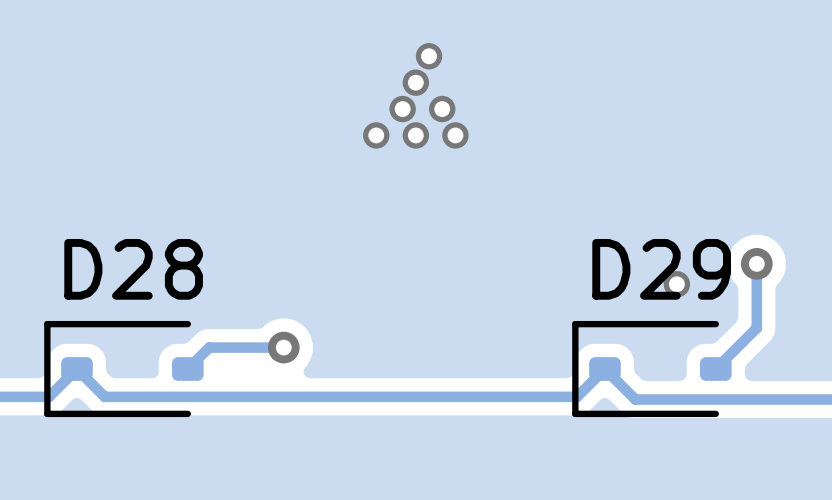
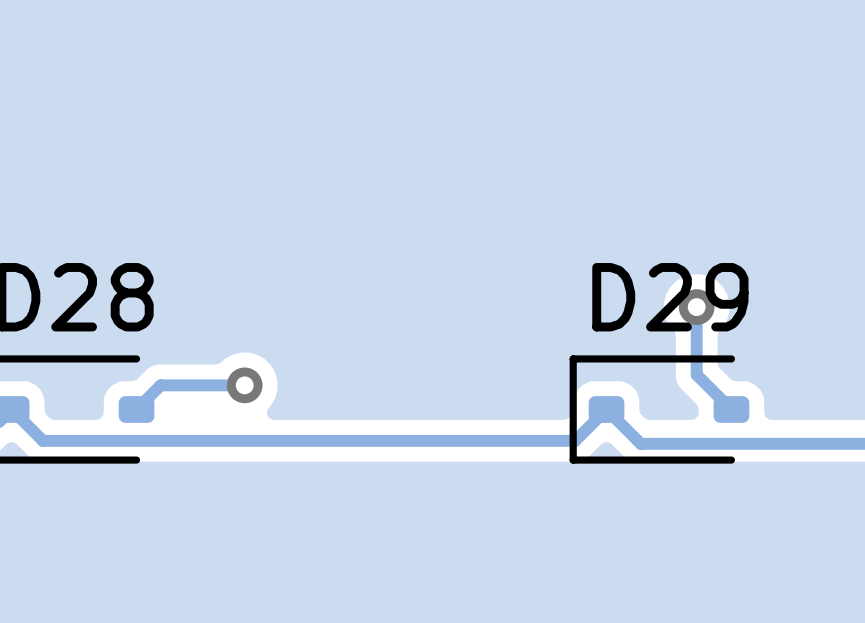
via: (429, 56) -> none
via: (415, 82) -> none
via: (402, 109) -> none
via: (442, 109) -> none
via: (376, 135) -> none
via: (415, 135) -> none
via: (455, 135) -> none
track: (756, 263) (756, 327) (715, 369) -> (696, 307) (696, 374) (731, 409)
via position: (756, 263) -> (696, 307)
via: (676, 284) -> none

